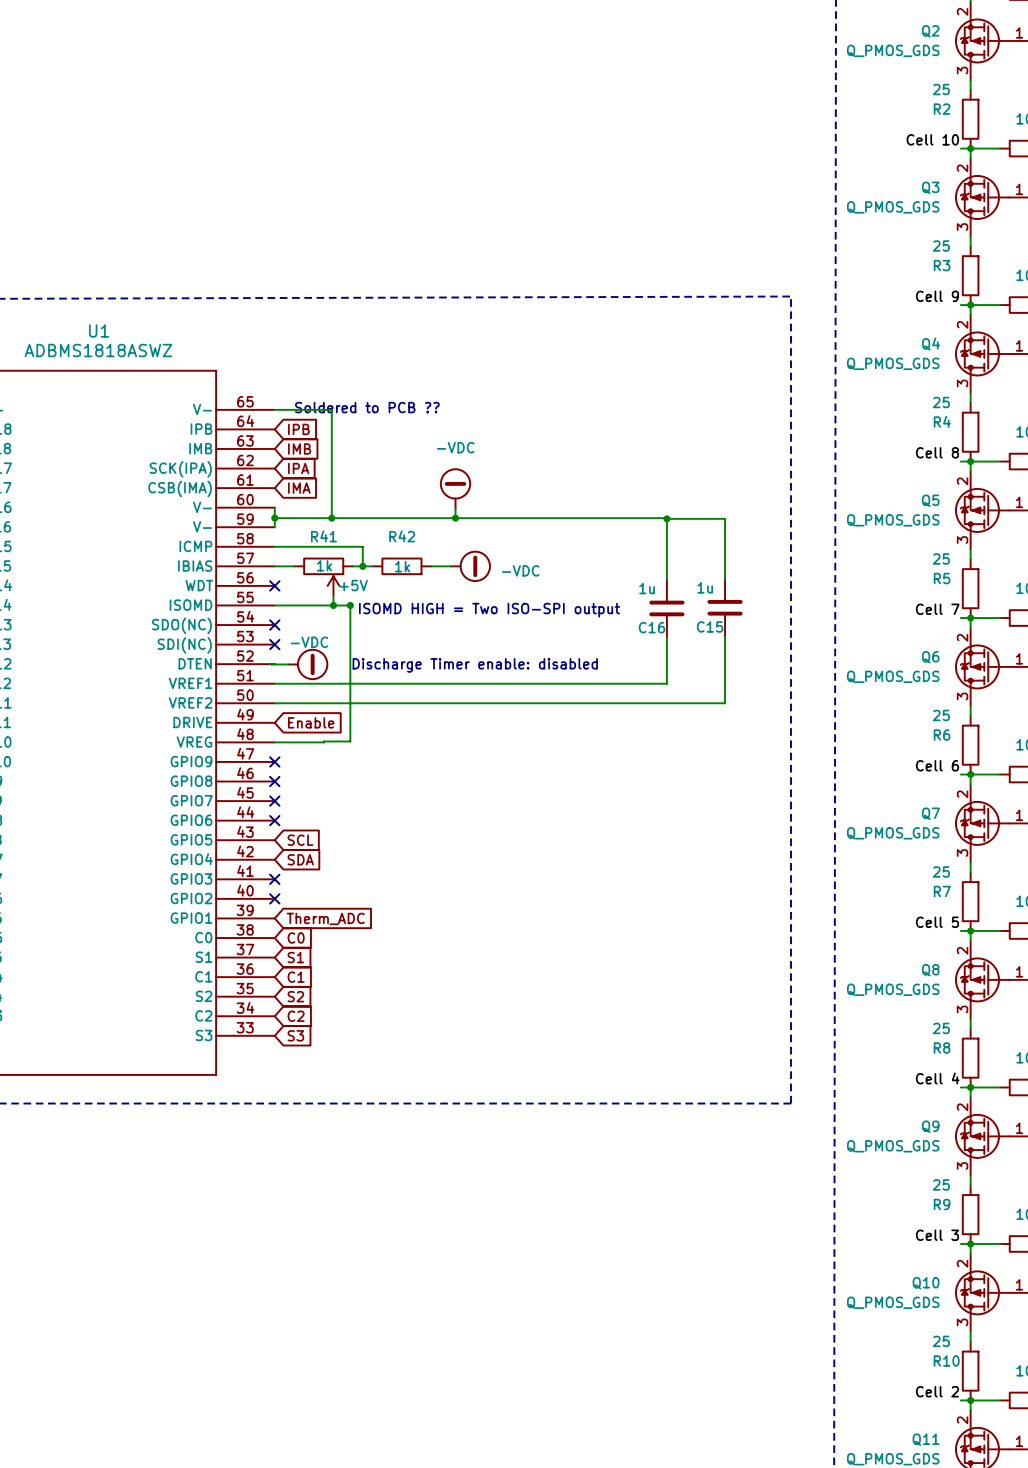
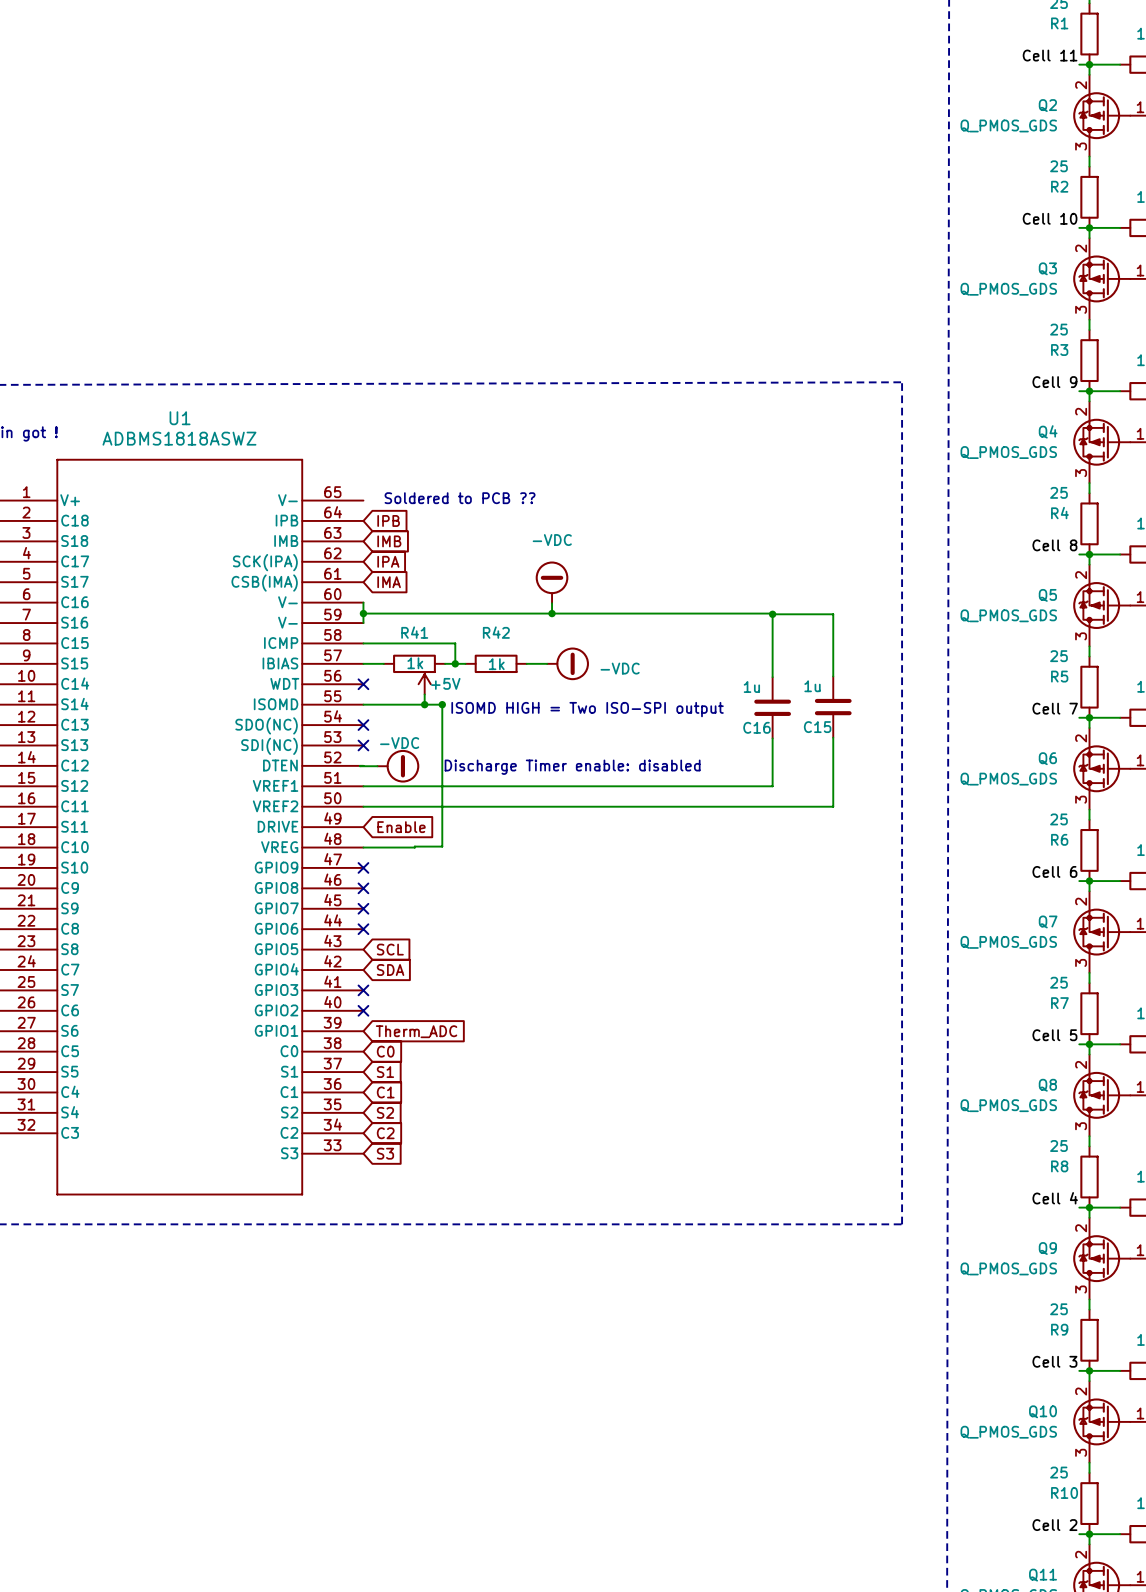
wire: (274, 409) (331, 409) (331, 518) -> none
junction: (331, 518) -> none

